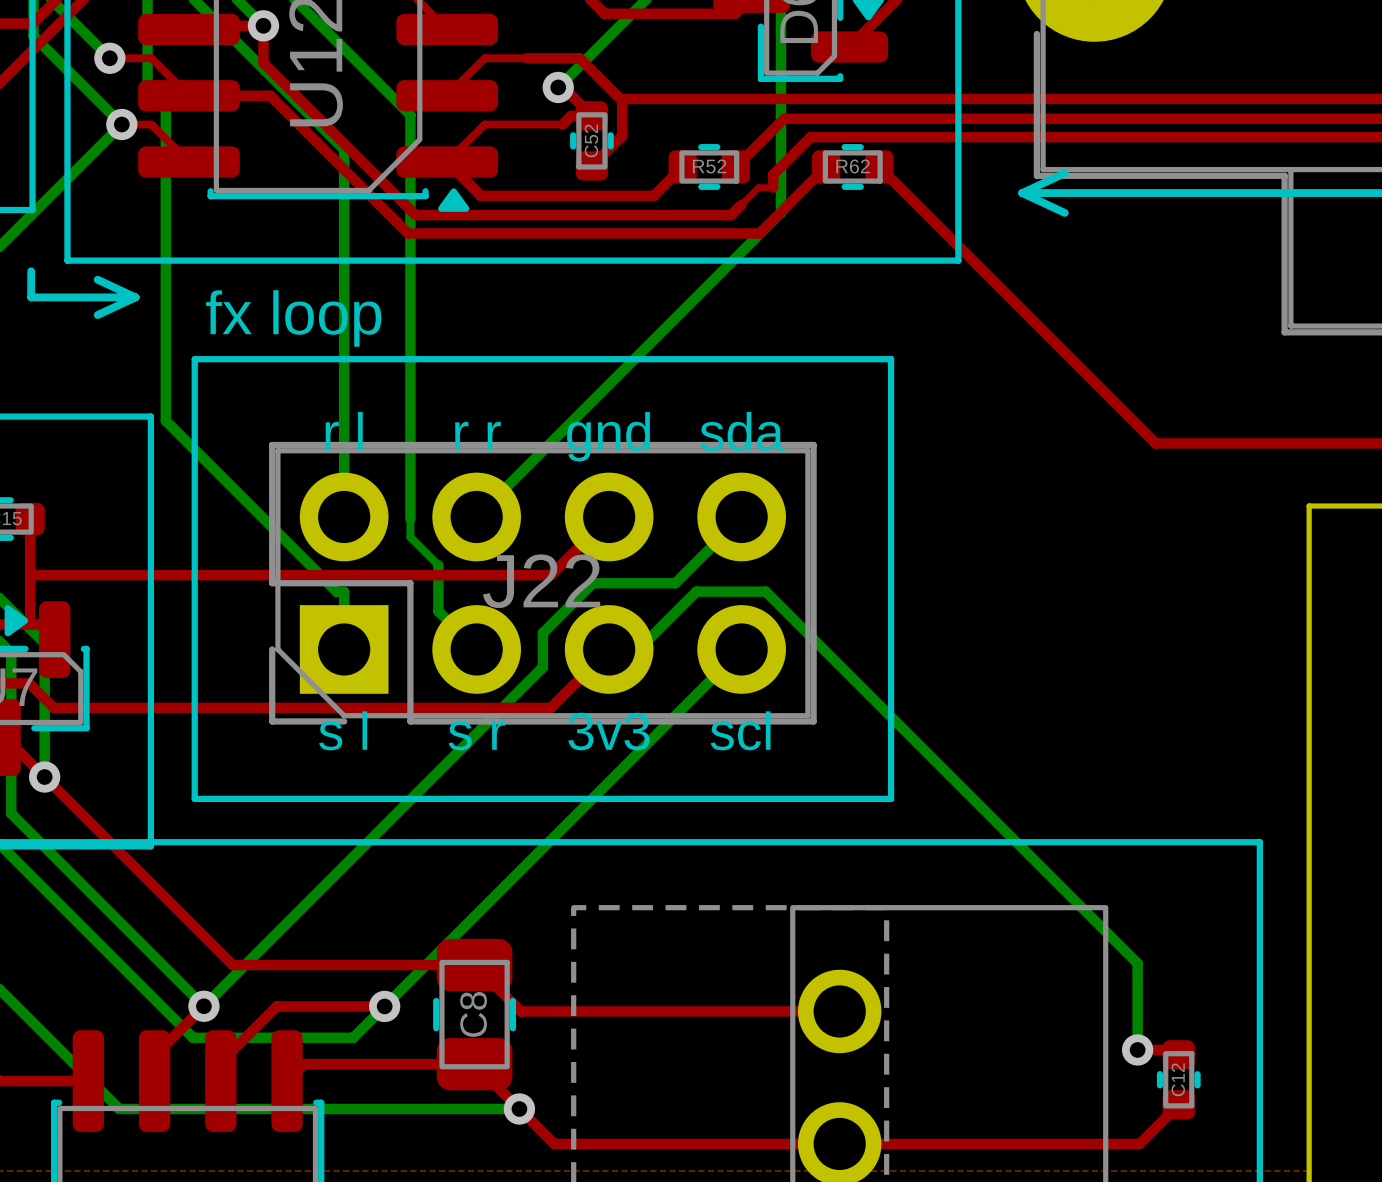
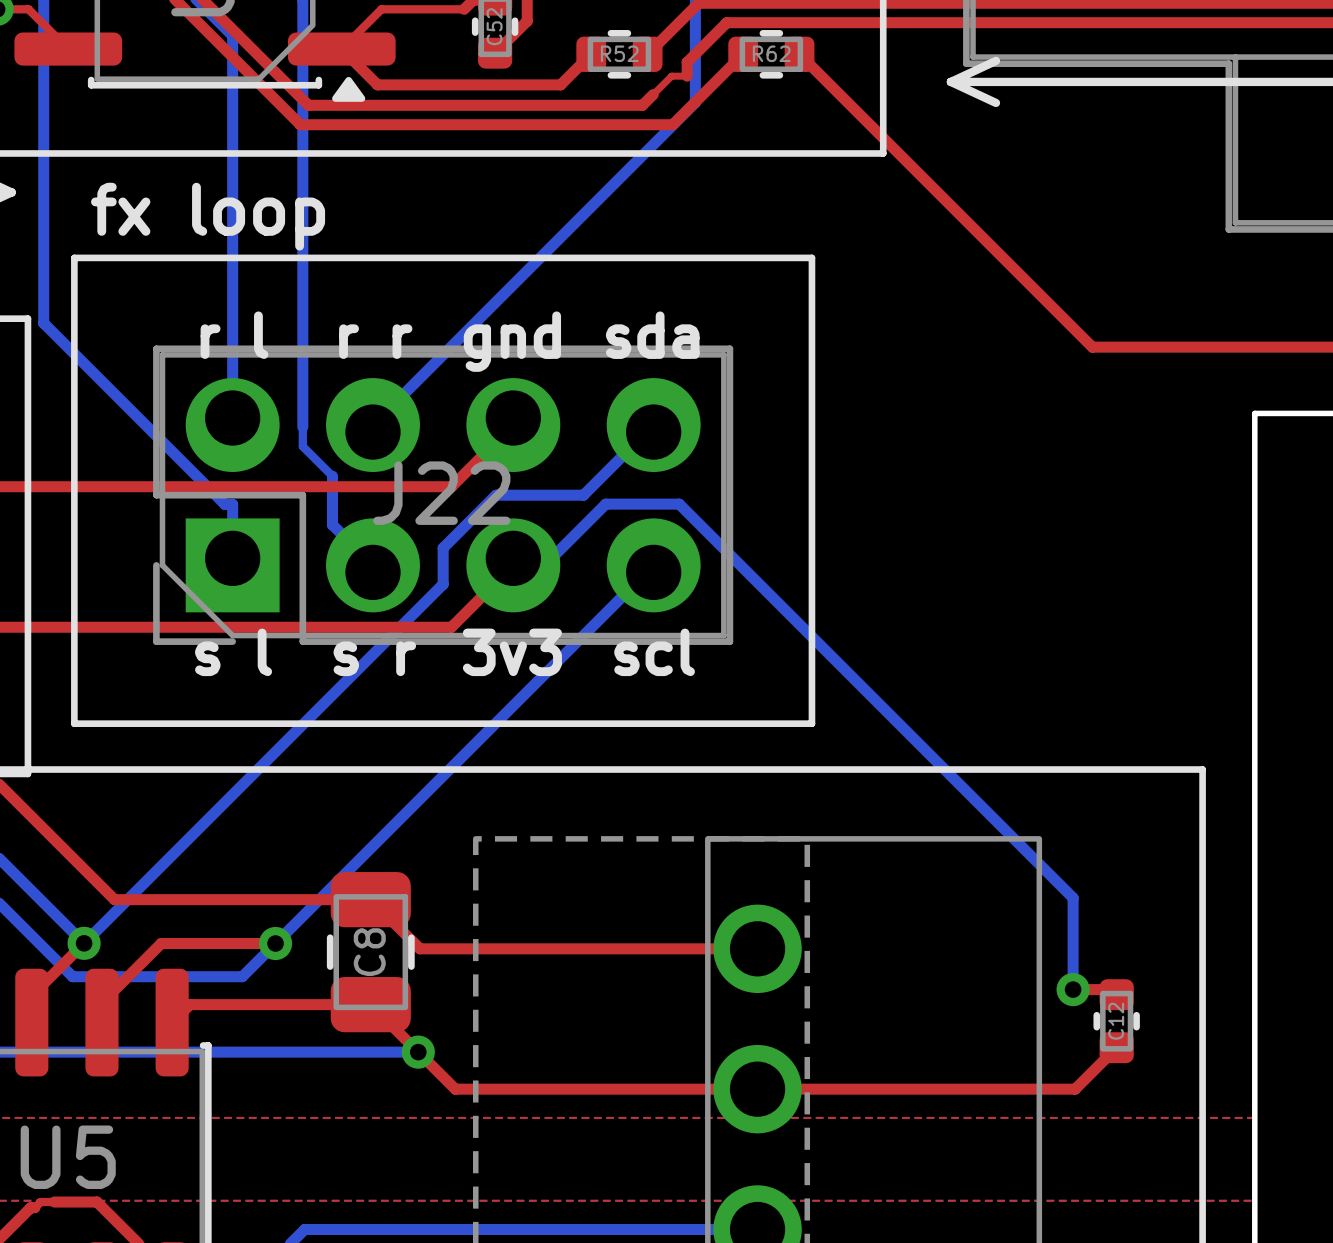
J22 footprint: [269, 441, 817, 725] -> [153, 345, 734, 645]

